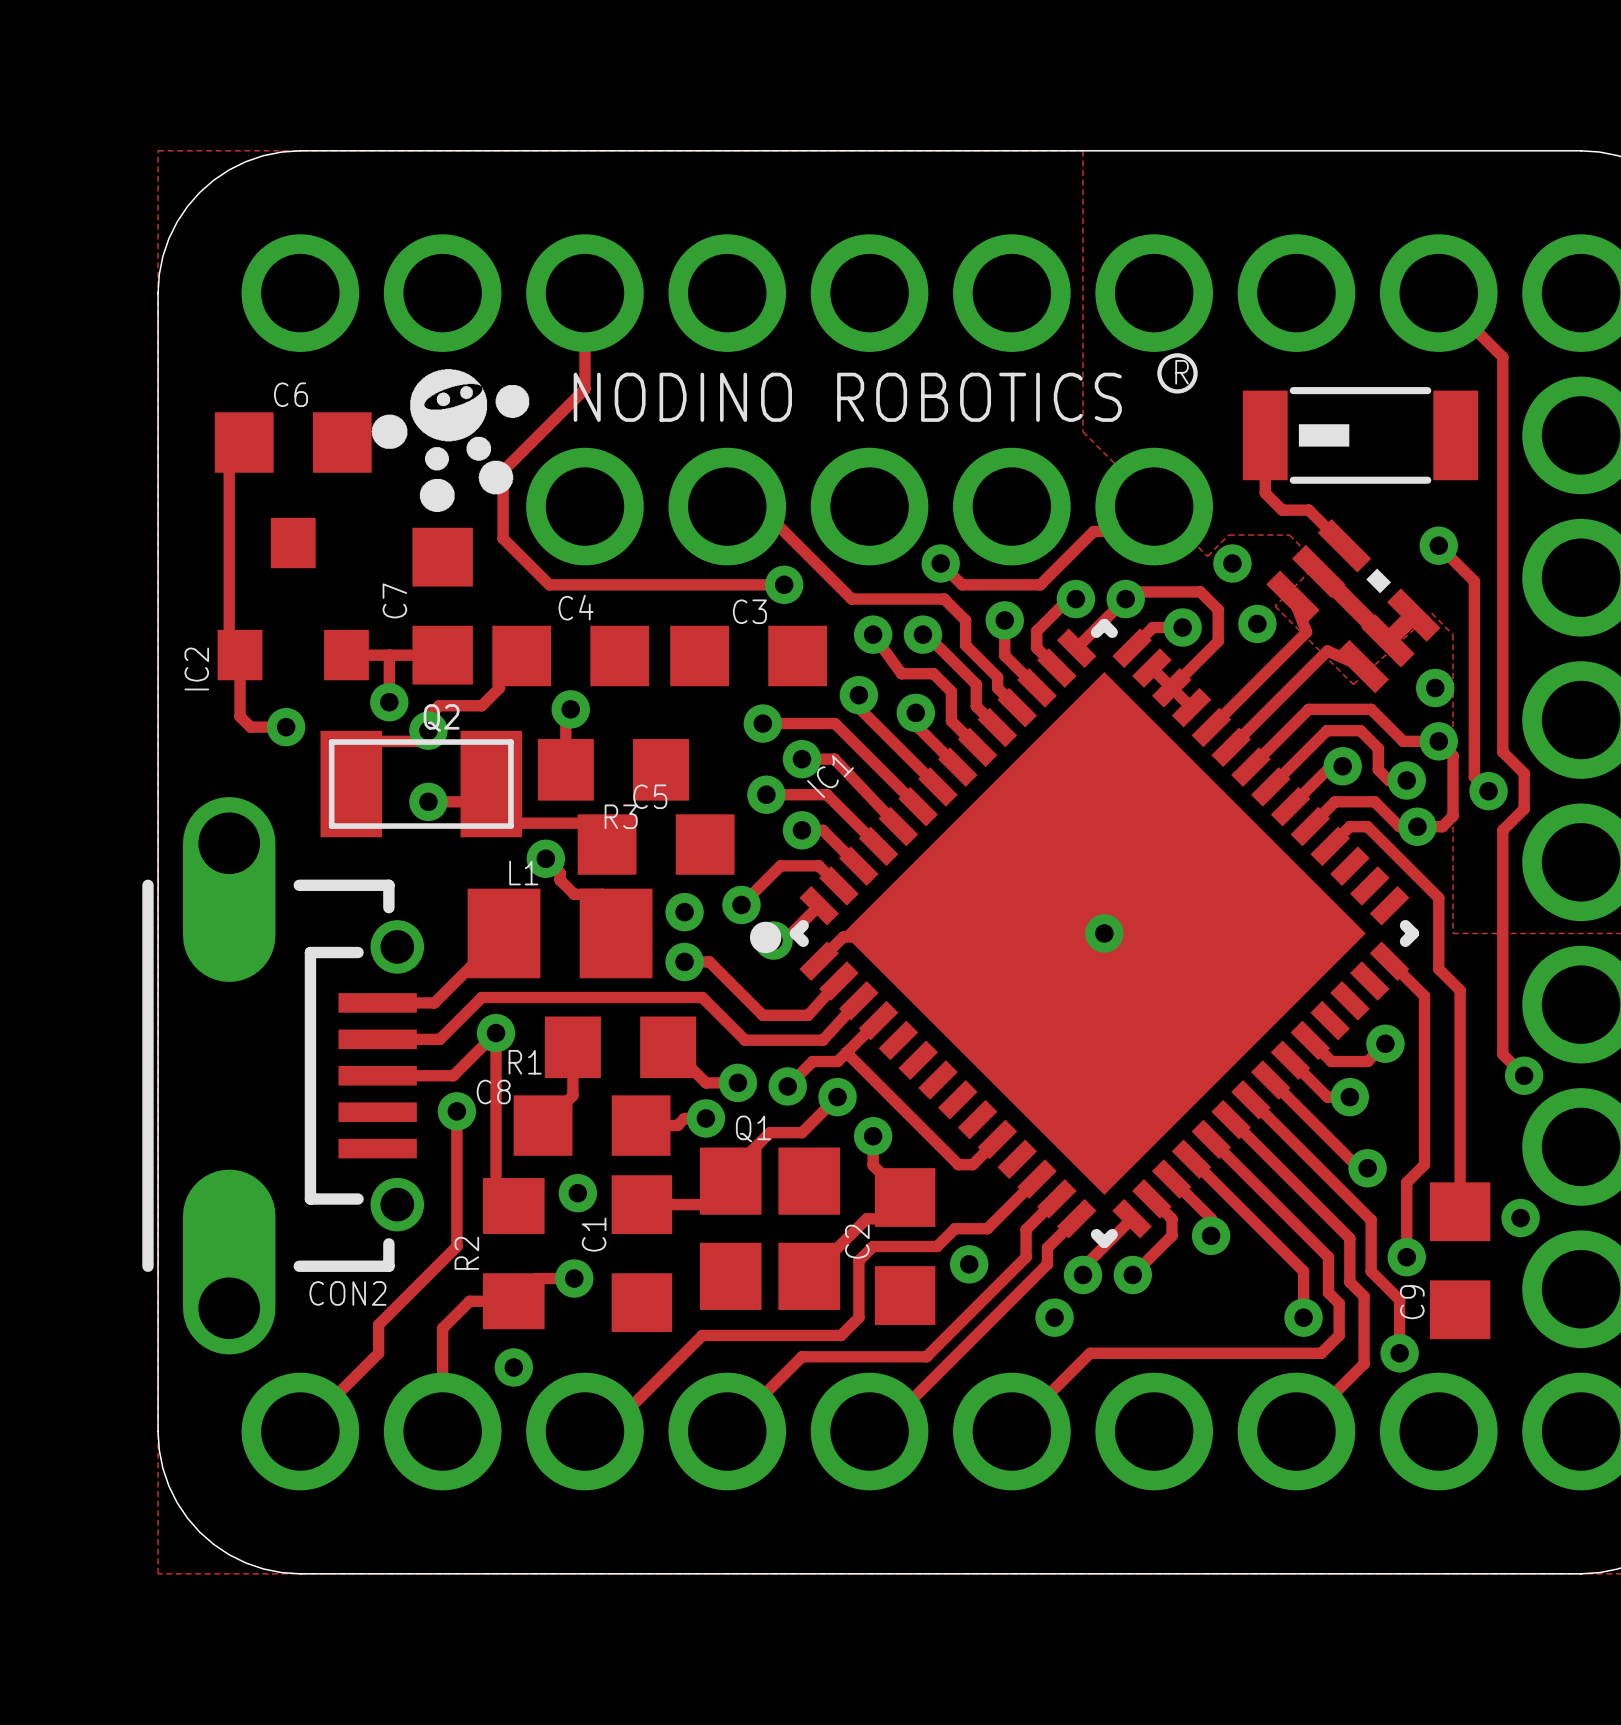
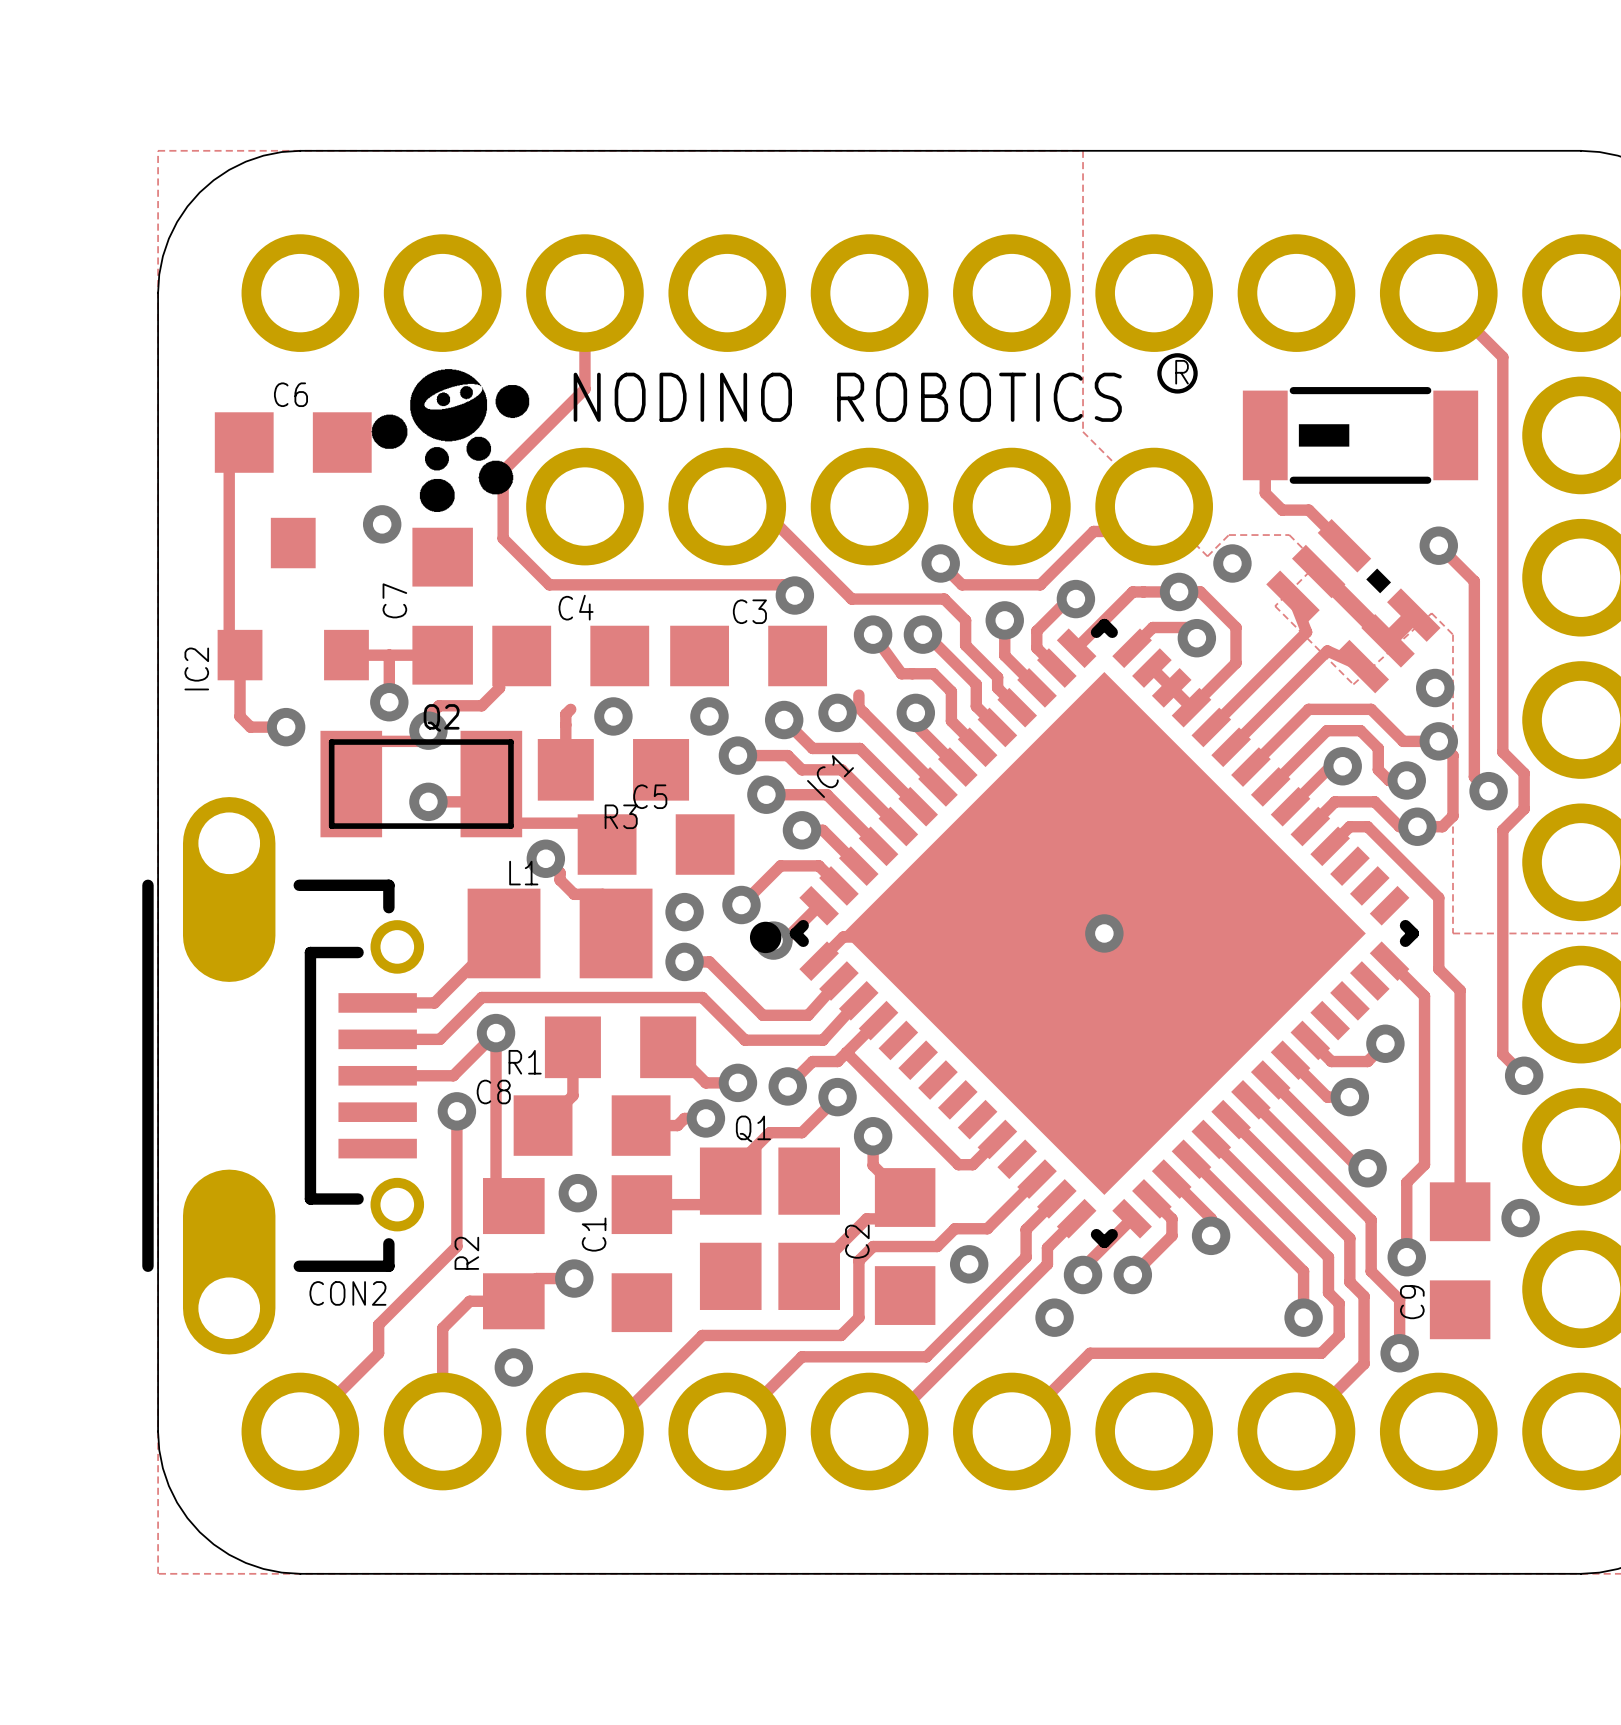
via: none -> (382, 524)
via position: (784, 584) -> (794, 595)
via: none -> (1179, 591)
via: (1125, 599) -> none
track: (1218, 609) (1218, 641) (1171, 687) -> (1218, 609) (1235, 627) (1235, 663) (1191, 707)
via: (1257, 623) -> none
via: (1182, 627) -> none
via: none -> (1196, 638)
via position: (858, 695) -> (837, 712)
via position: (570, 709) -> (613, 716)
via: none -> (709, 716)
via: none -> (784, 720)
track: (762, 723) (835, 723) (859, 748) -> (784, 720) (812, 748) (859, 748)
via: (762, 723) -> none
via: none -> (737, 755)
track: (801, 759) (834, 759) (898, 826) -> (737, 755) (787, 755) (801, 769) (841, 769) (898, 826)
via: (801, 759) -> none

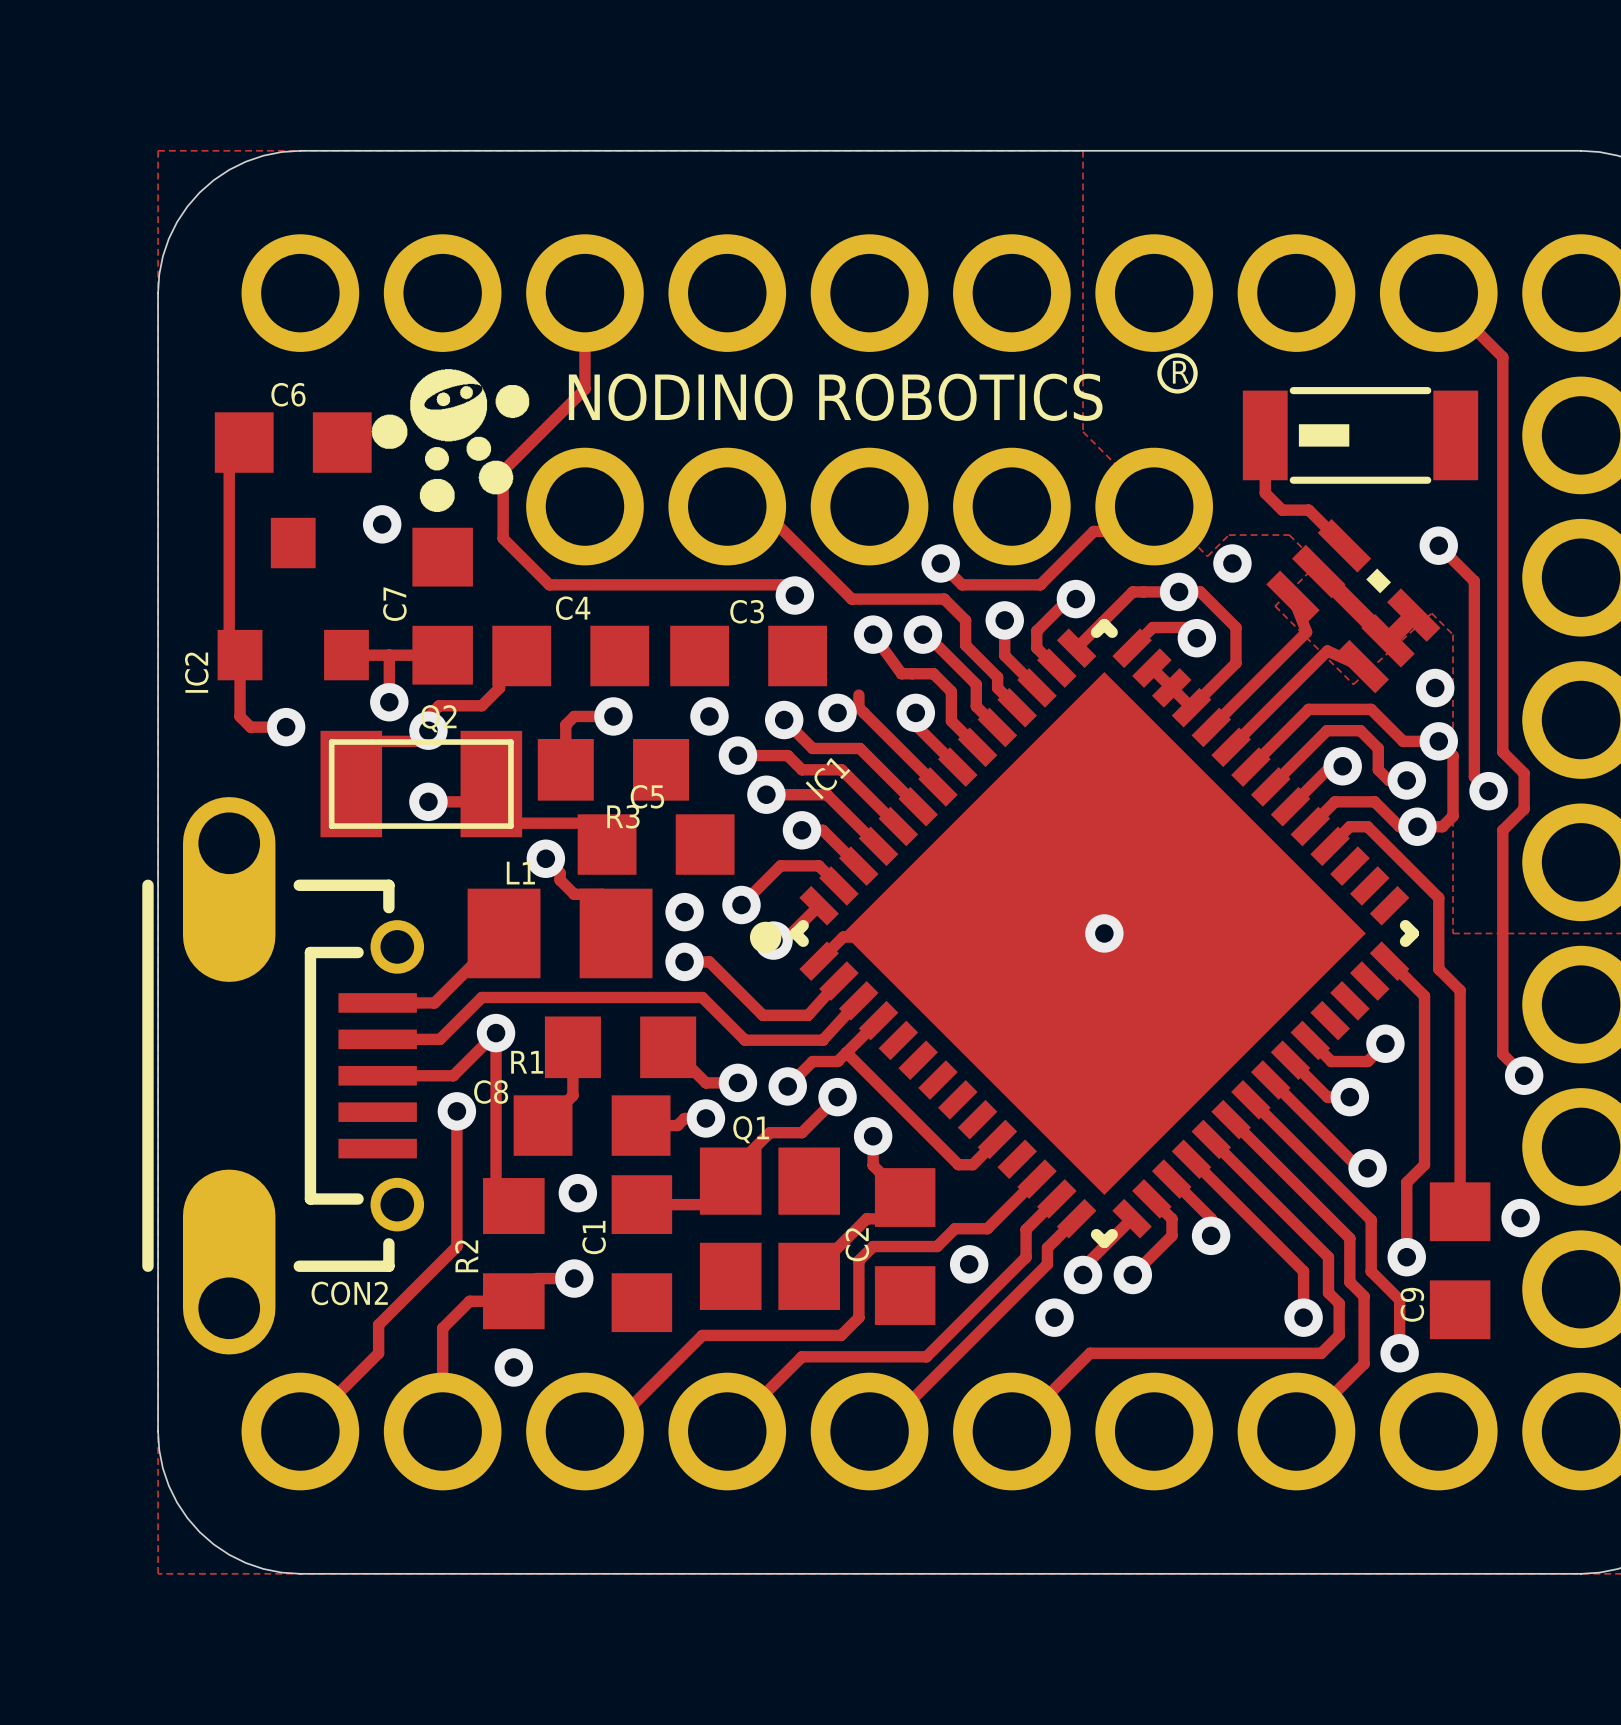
track: (570, 709) (565, 714) (565, 724) -> (613, 716) (574, 716) (565, 724)

